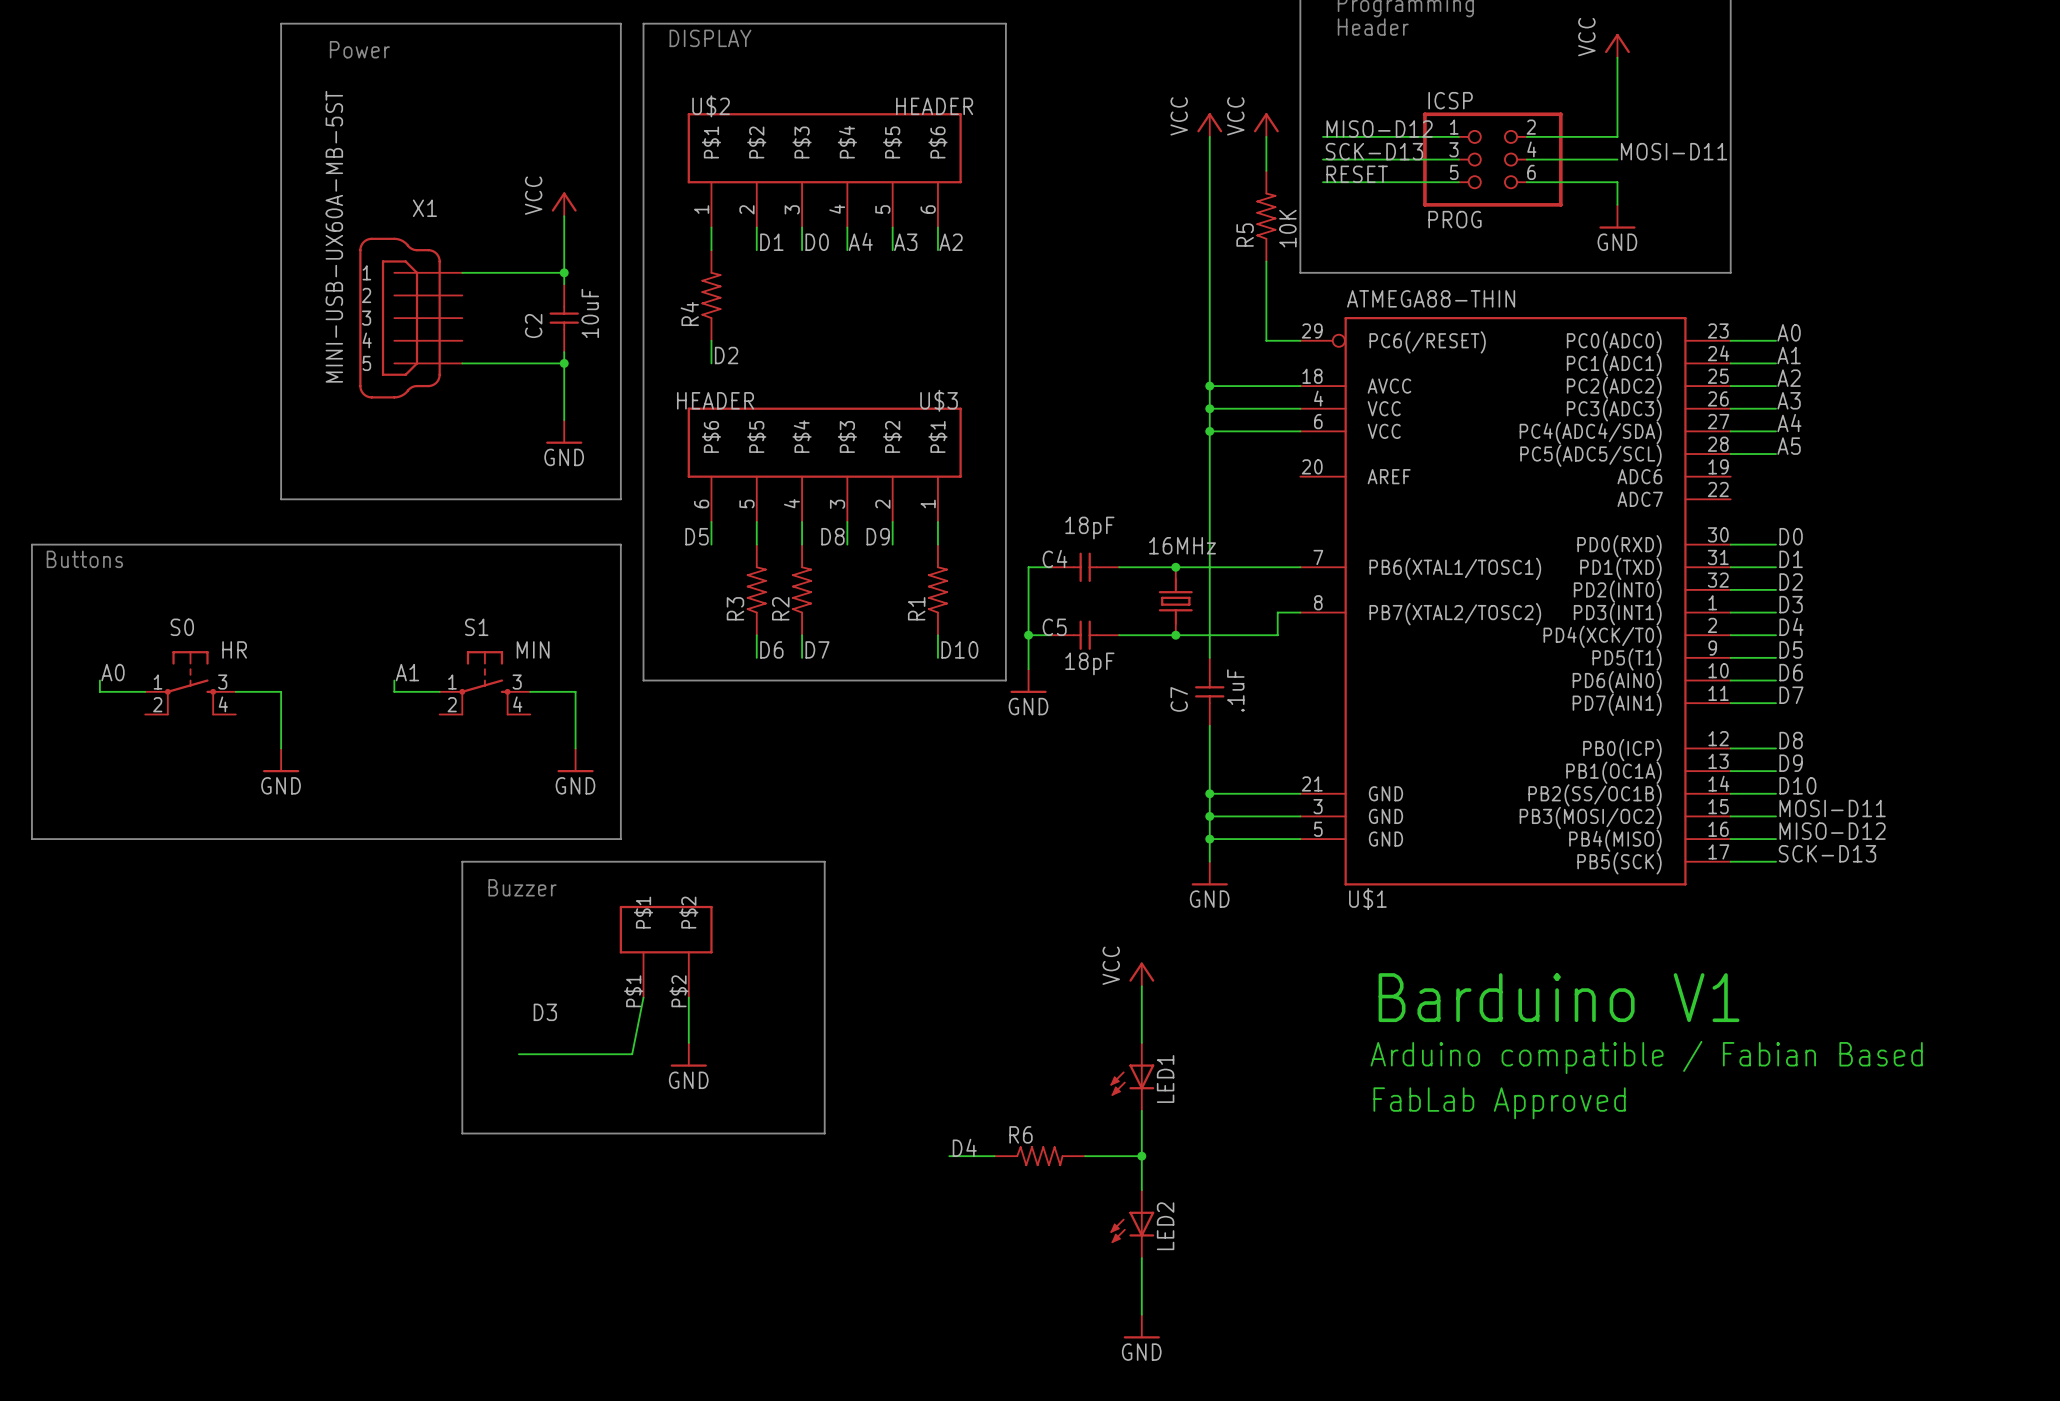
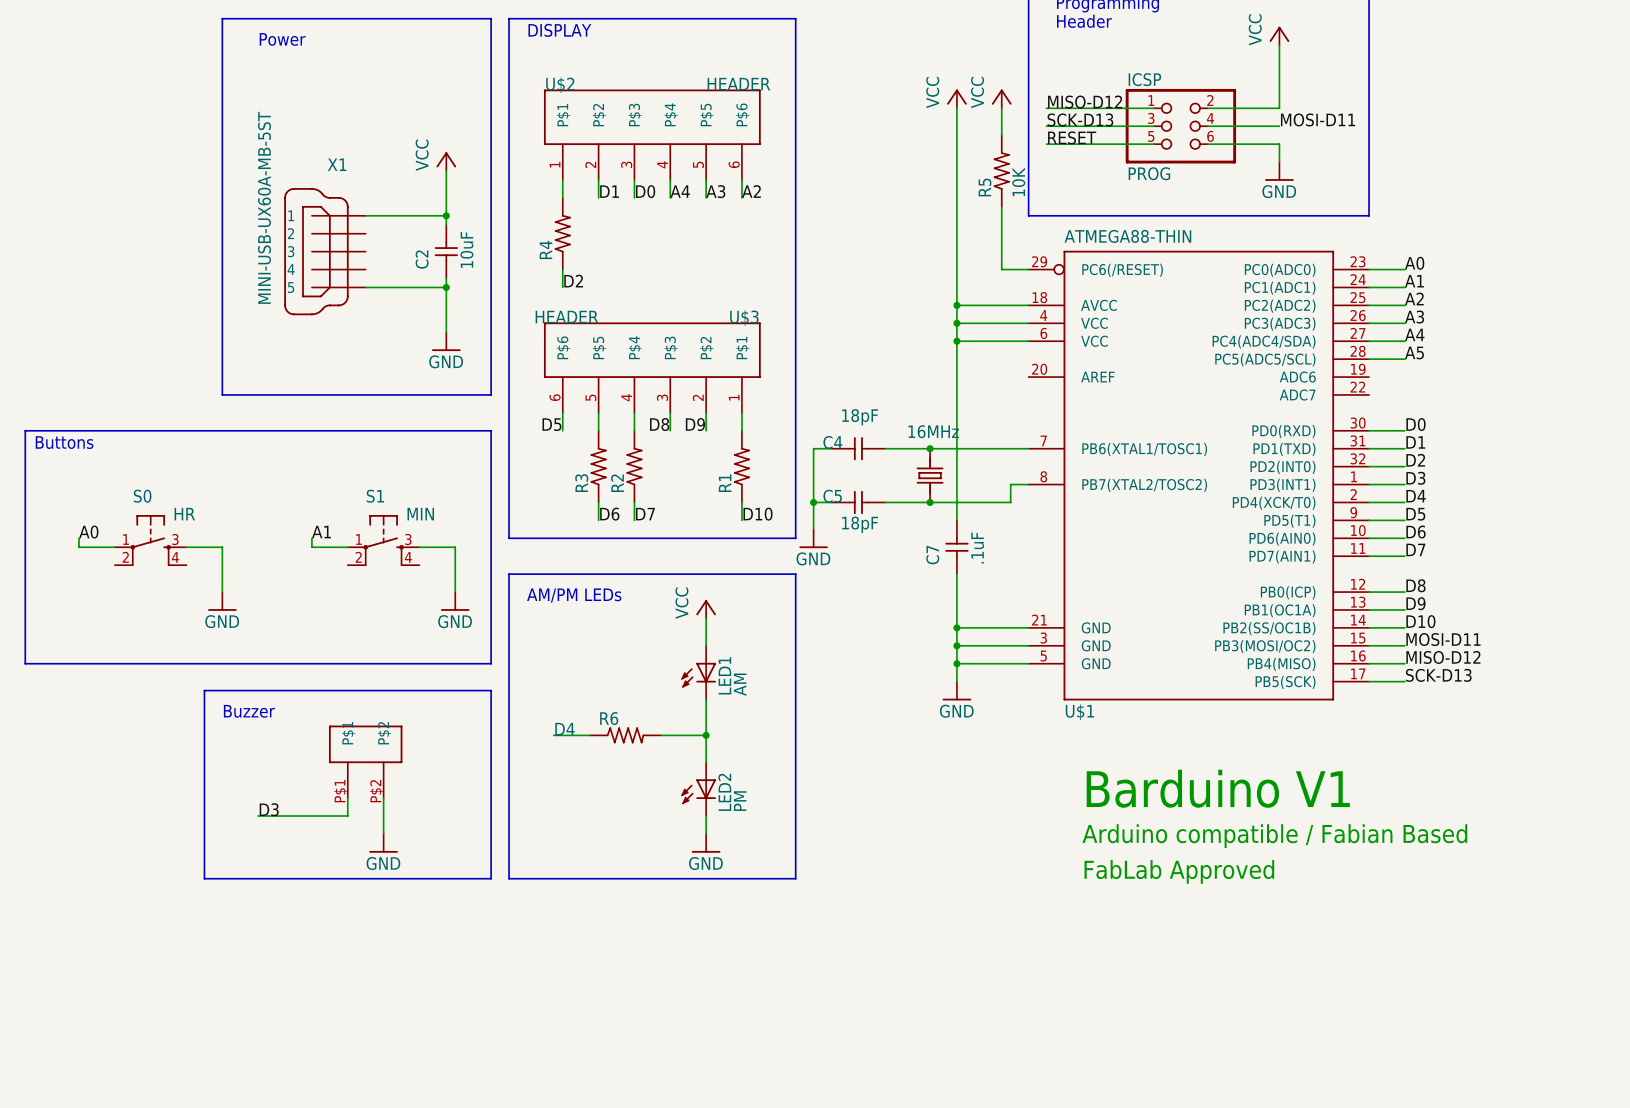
line: none -> (509, 574) (509, 878) (795, 878) (795, 574) (509, 574)
text: none -> AM/PM LEDs (574, 595)
power symbol: none -> VCC (706, 609)
wire: none -> (706, 618) (706, 645)
line: (462, 861) (462, 1133) (824, 1133) (824, 861) (462, 861) -> none
LED1 value: none -> AM (740, 684)
line: none -> (204, 690) (204, 878) (491, 878) (491, 690) (204, 690)
wire: none -> (706, 699) (706, 762)
text position: Buzzer (522, 887) -> Buzzer (249, 711)
text: none -> D4 (565, 729)
wire: none -> (553, 735) (589, 735)
wire: none -> (661, 735) (706, 735)
junction: none -> (706, 735)
part position: (666, 951) -> (365, 761)
power symbol: VCC (1141, 974) -> none
wire: (1141, 986) (1141, 1042) -> none
wire: (643, 997) (632, 1054) (518, 1054) -> none
wire: (688, 997) (688, 1042) -> (383, 798) (383, 833)
wire: none -> (347, 798) (347, 816) (258, 816)
LED2 value: none -> PM (740, 801)
label position: D3 (545, 1012) -> D3 (269, 809)
wire: none -> (706, 816) (706, 833)
power symbol: GND (688, 1054) -> none
power symbol: none -> GND (383, 843)
power symbol: none -> GND (706, 843)
LED1 position: (1132, 1076) -> (698, 672)
wire: (1141, 1110) (1141, 1190) -> none
text: D4 (964, 1147) -> none
wire: (949, 1156) (994, 1156) -> none
R6 position: (1039, 1156) -> (625, 735)
wire: (1085, 1156) (1141, 1156) -> none
junction: (1141, 1156) -> none
LED2 position: (1132, 1224) -> (698, 789)
wire: (1141, 1258) (1141, 1314) -> none
power symbol: GND (1141, 1326) -> none

